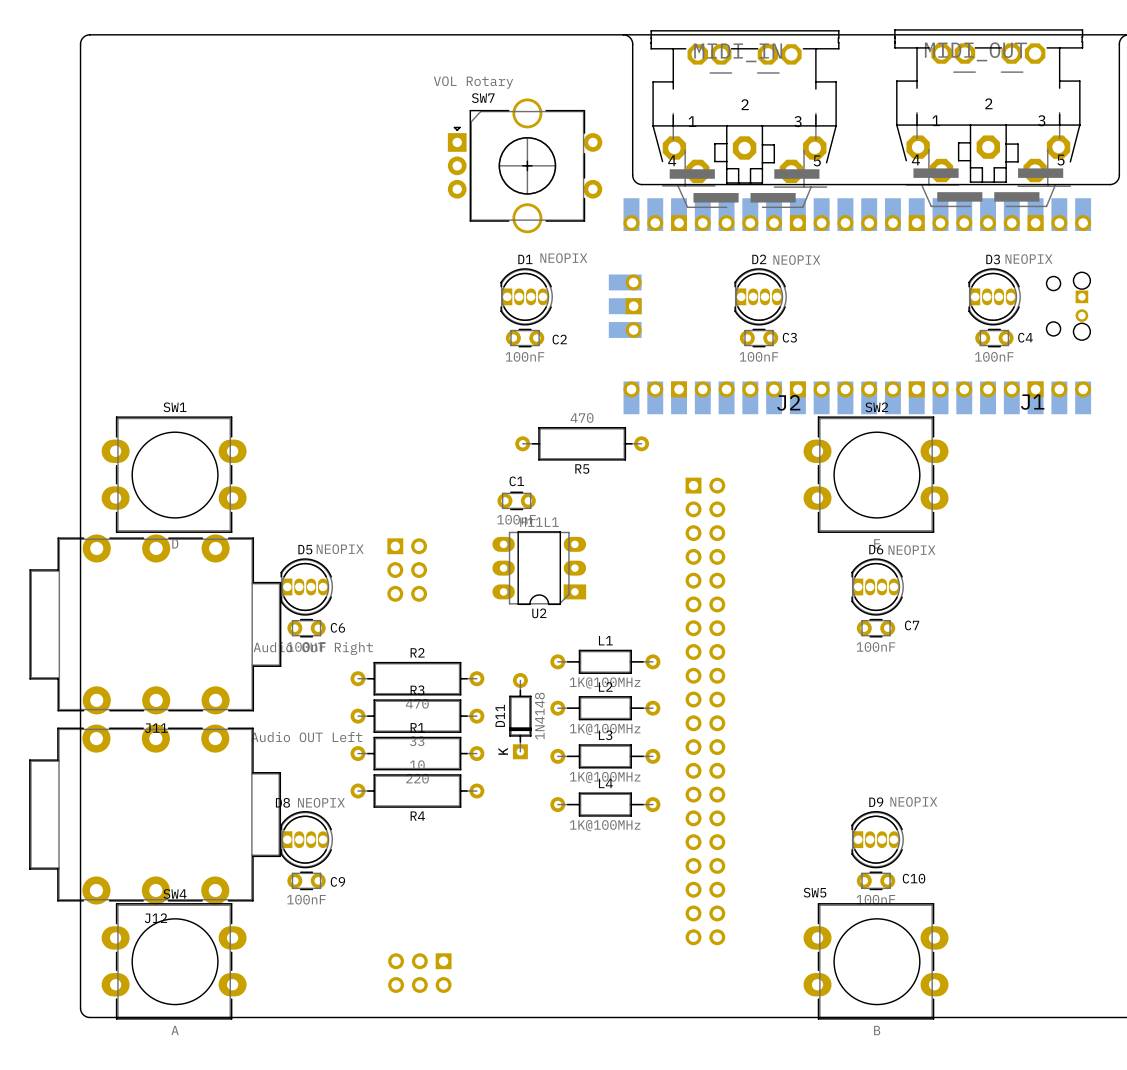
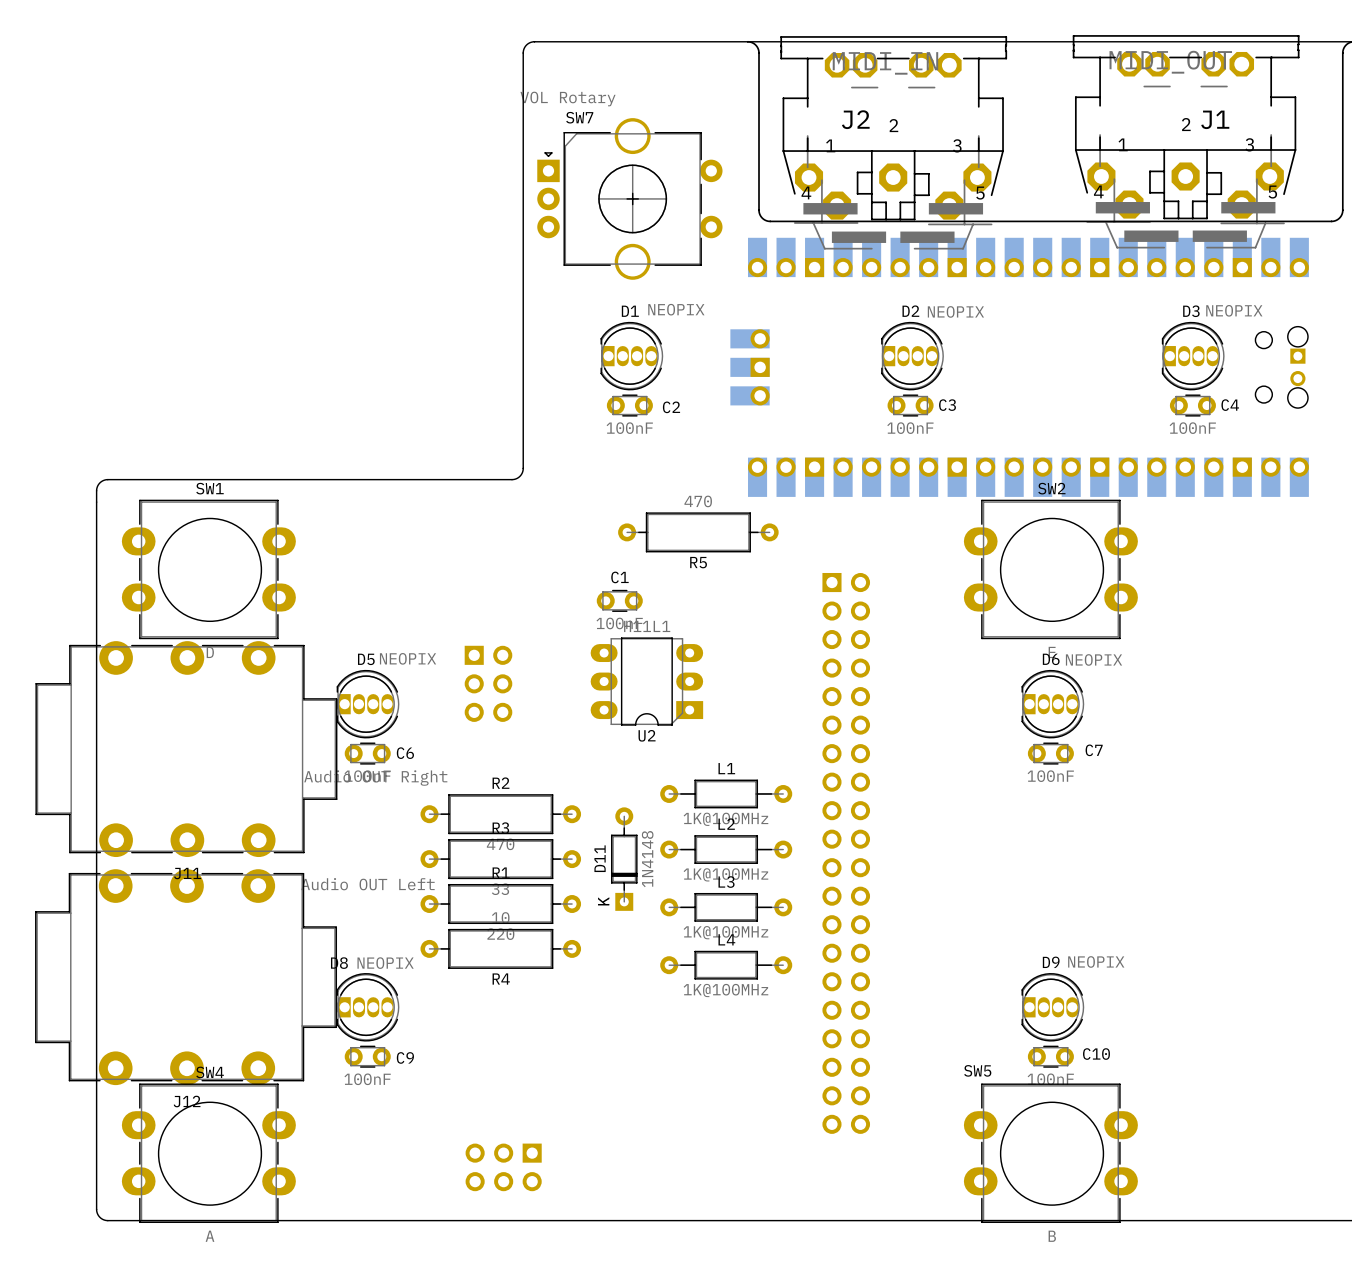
board edge: (445, 34) (89, 34) (83, 37) (80, 44) (80, 409) -> (534, 41) (526, 45) (523, 53) (523, 468) (519, 476) (512, 479) (107, 479) (99, 482) (96, 490)
J2 name position: J2 (788, 402) -> J2 (855, 119)
J1 name position: J1 (1032, 402) -> J1 (1215, 119)

